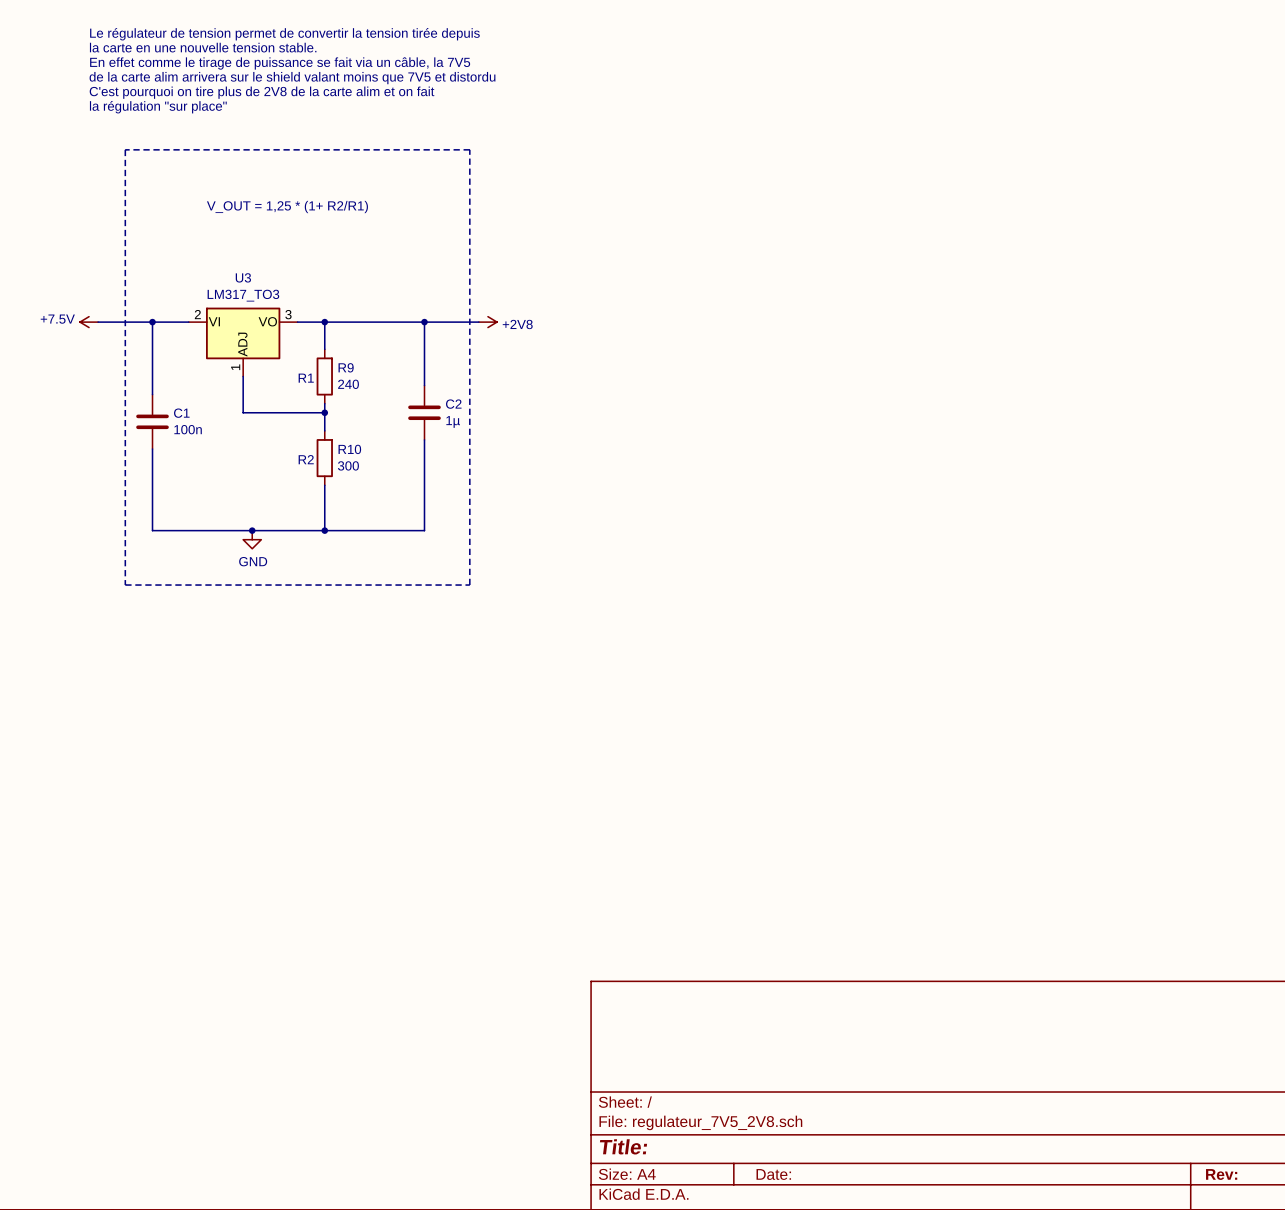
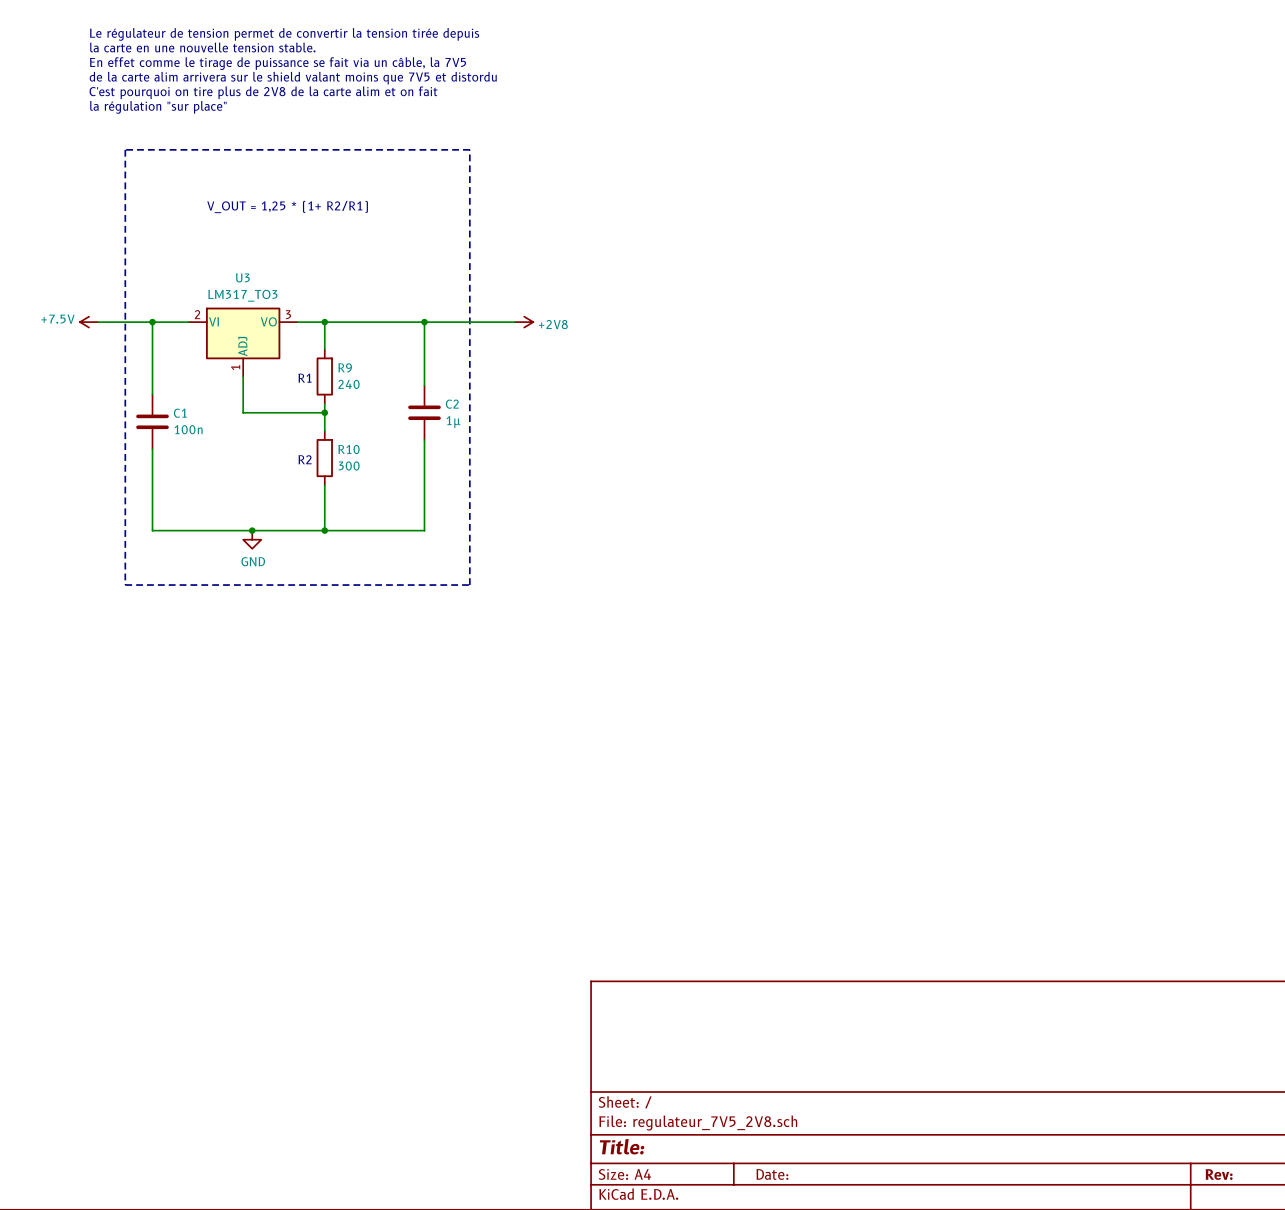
power symbol position: +2V8 (487, 322) -> +2V8 (524, 322)

